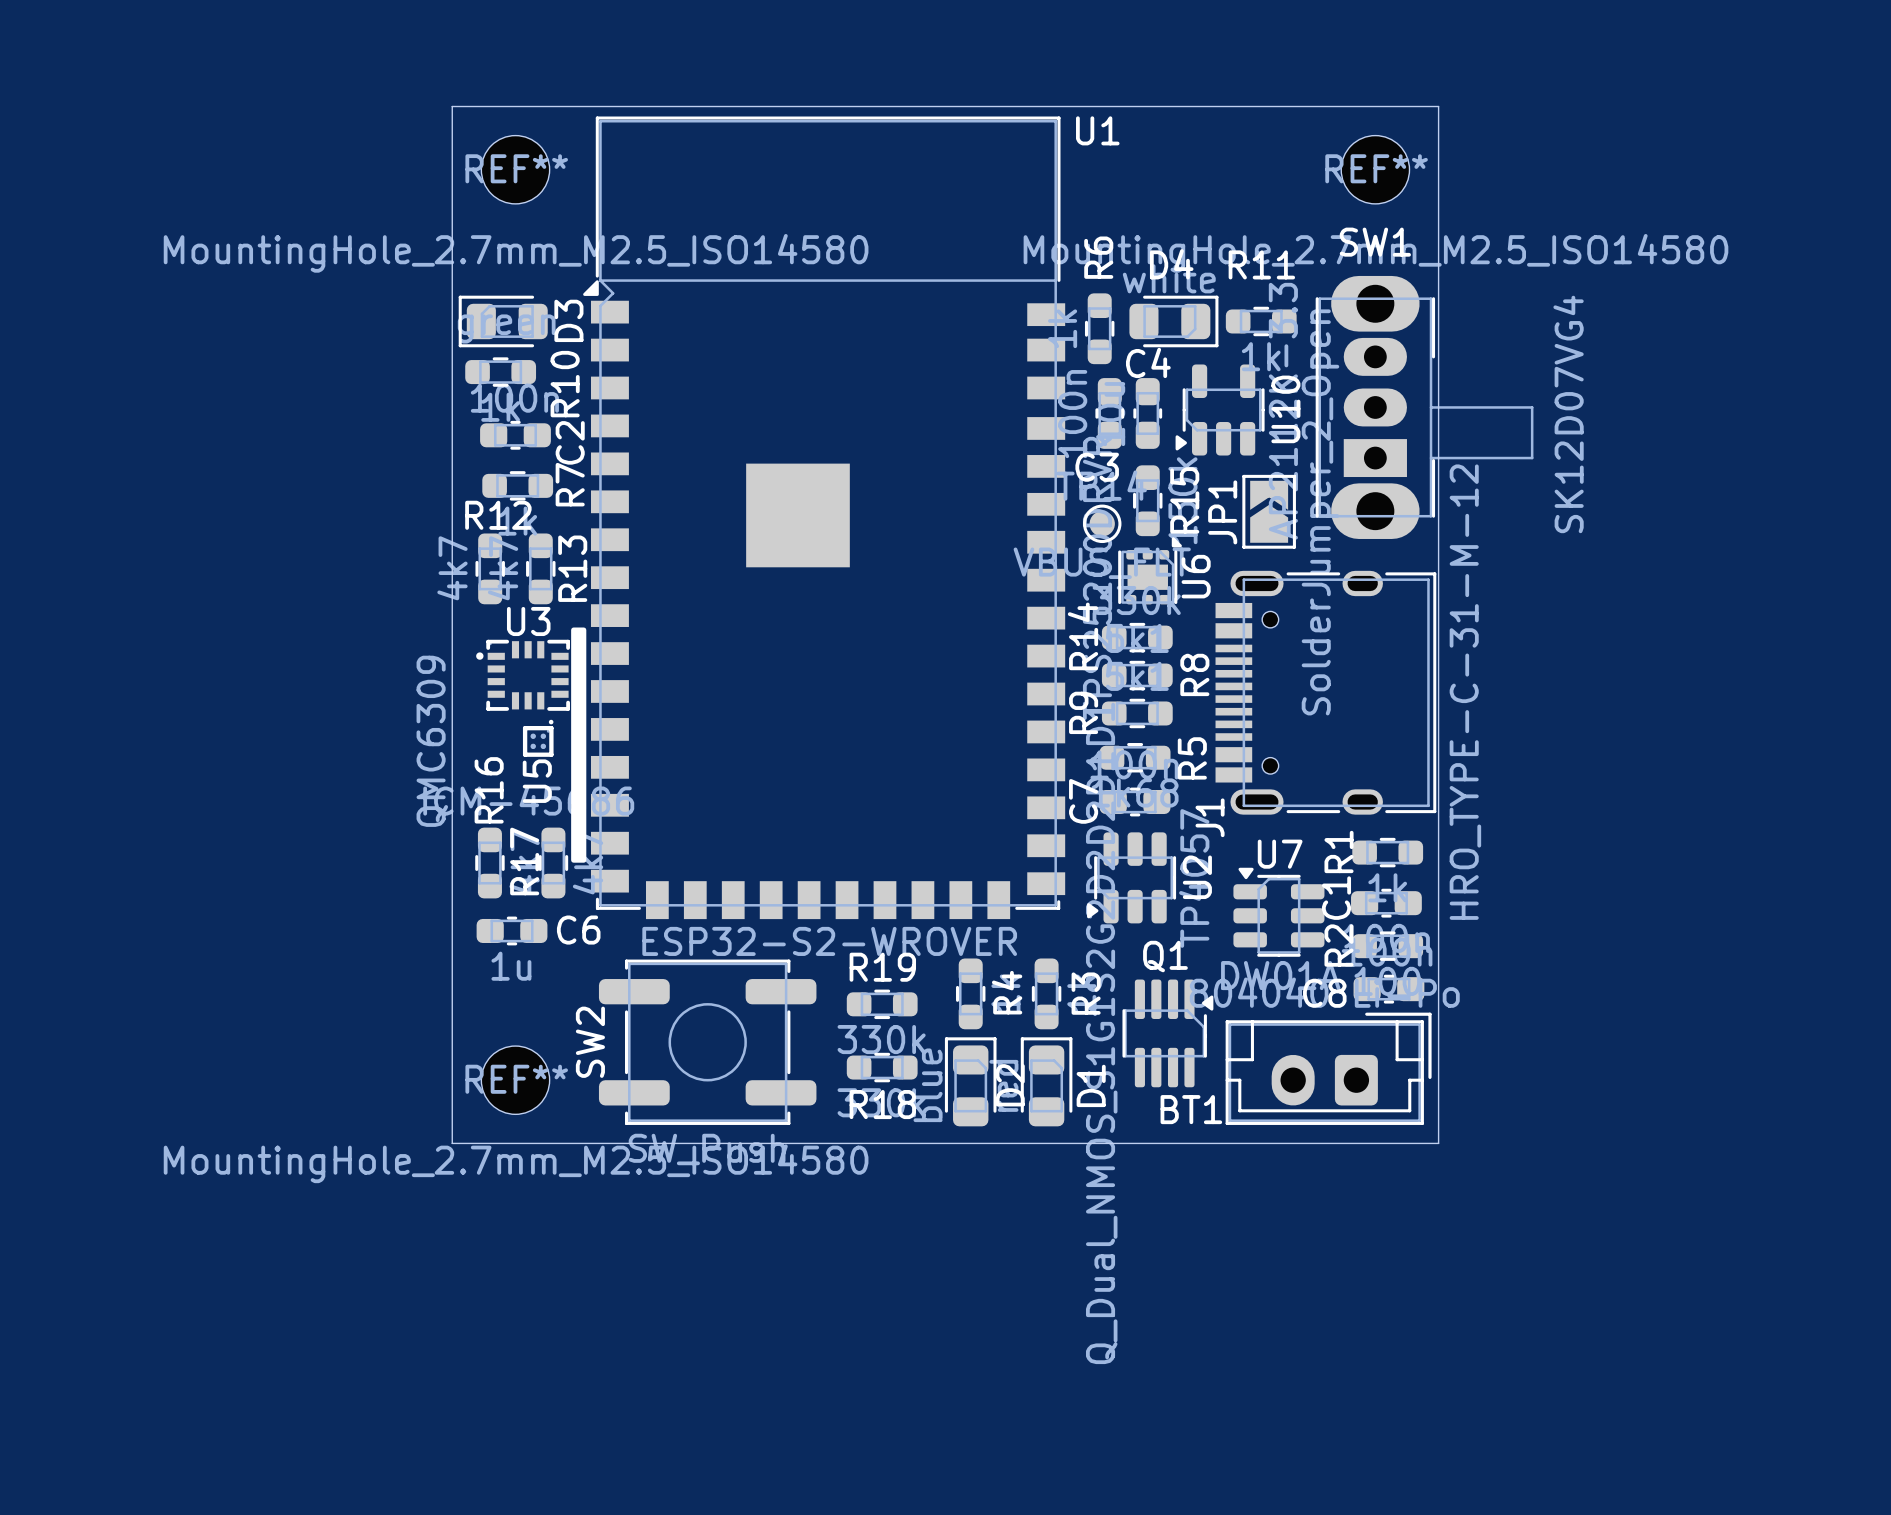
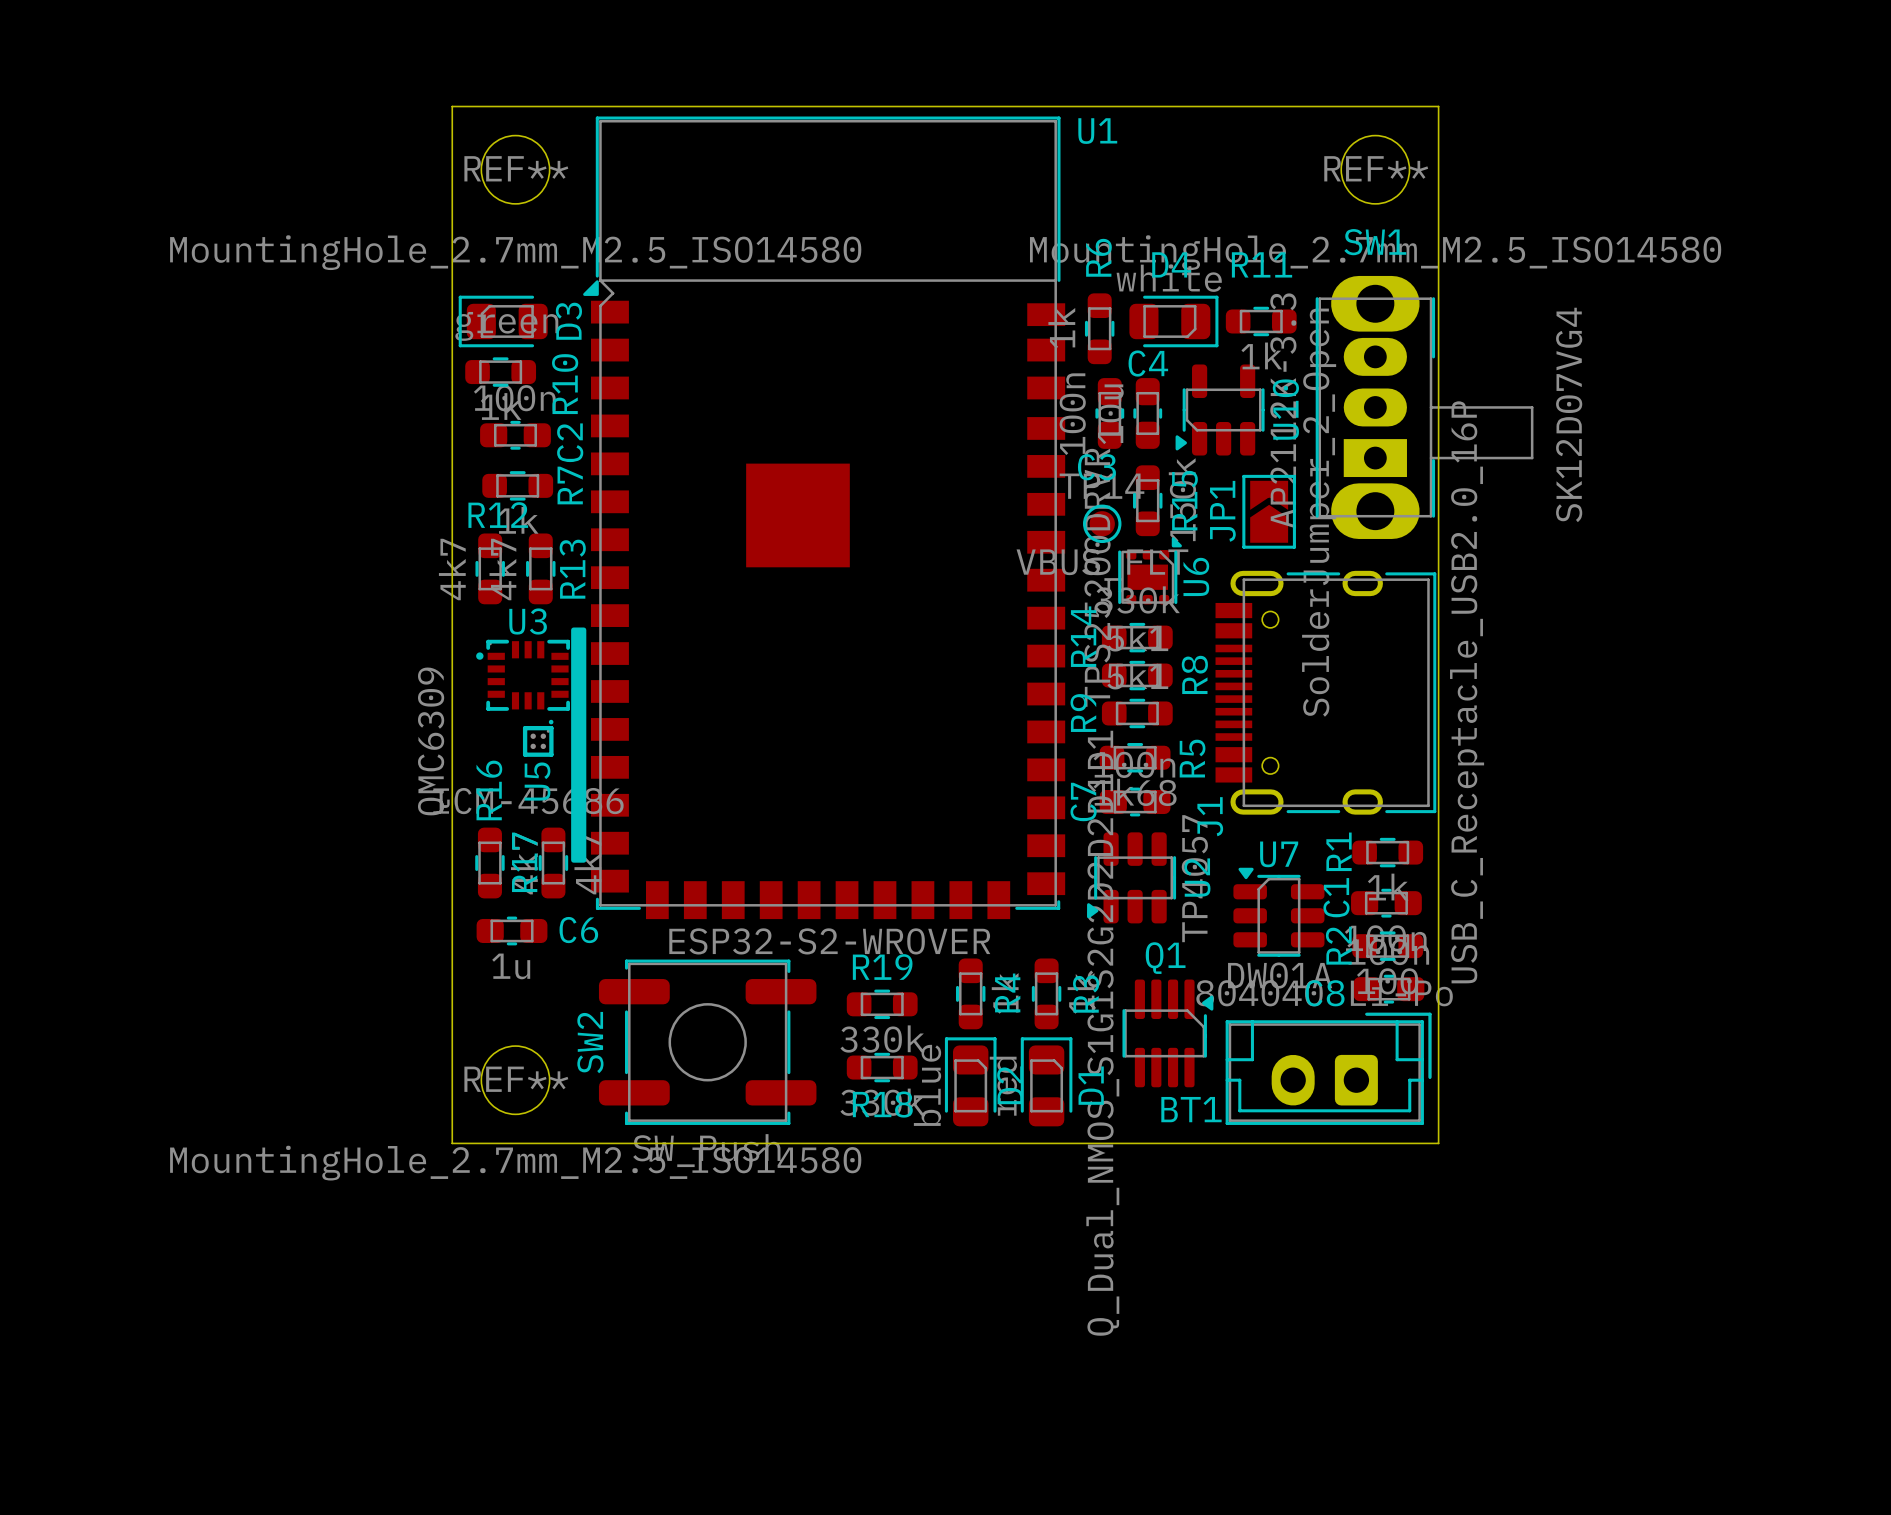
J1 value: HRO_TYPE-C-31-M-12 (1465, 692) -> USB_C_Receptacle_USB2.0_16P (1467, 692)

